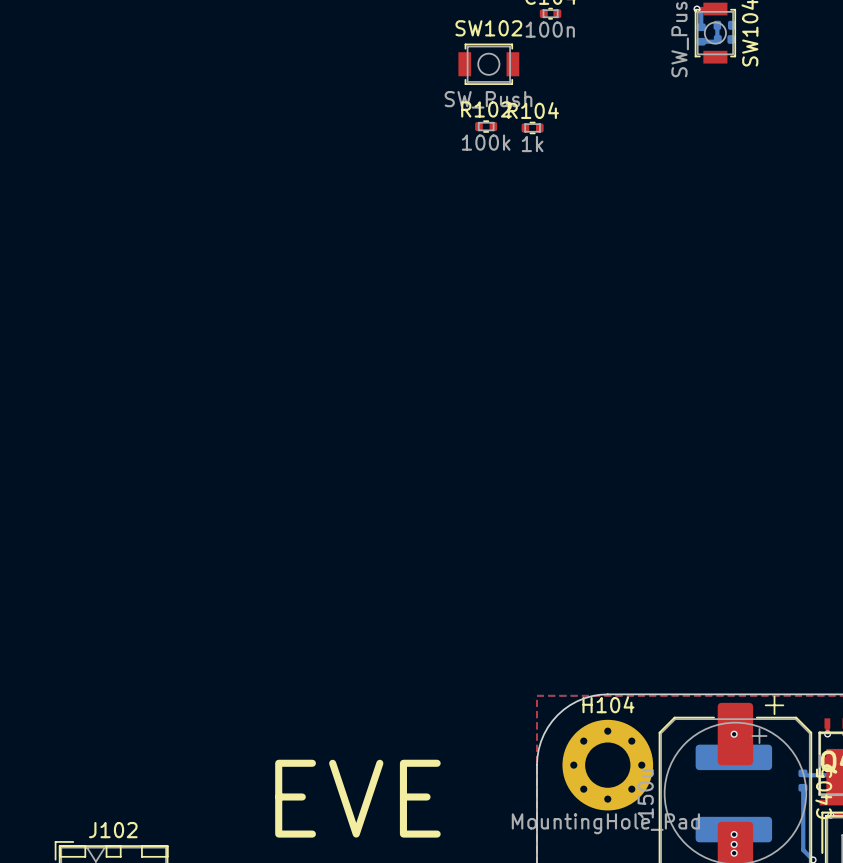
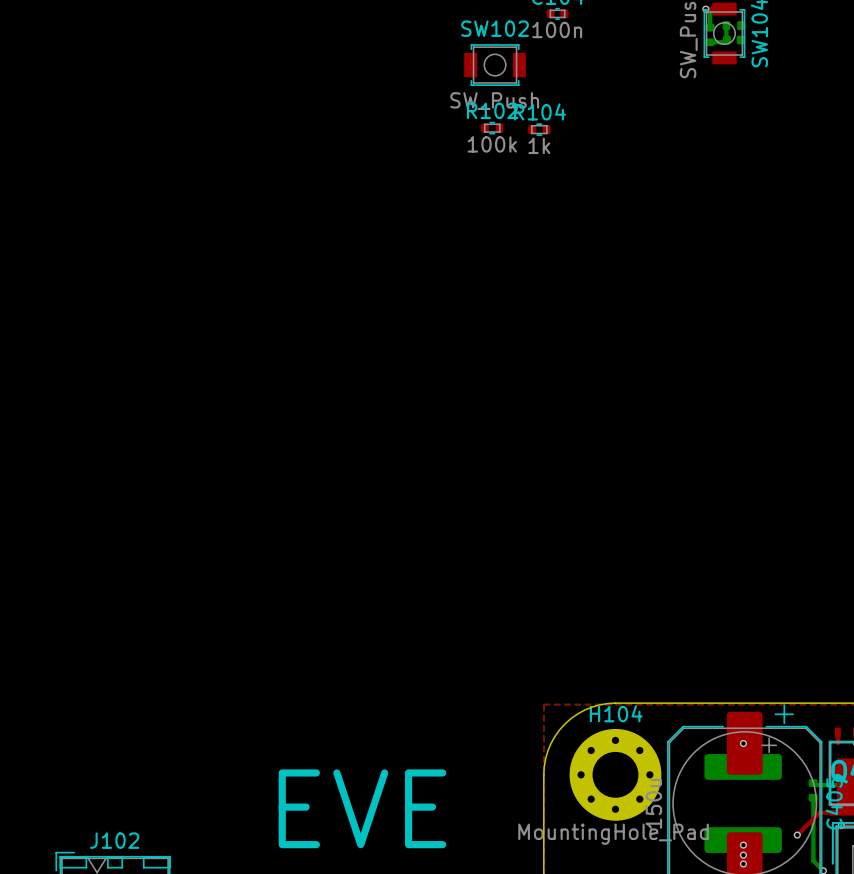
via: (827, 733) -> none
top track: none -> (833, 812) (819, 812) (797, 835)
via: none -> (797, 835)

